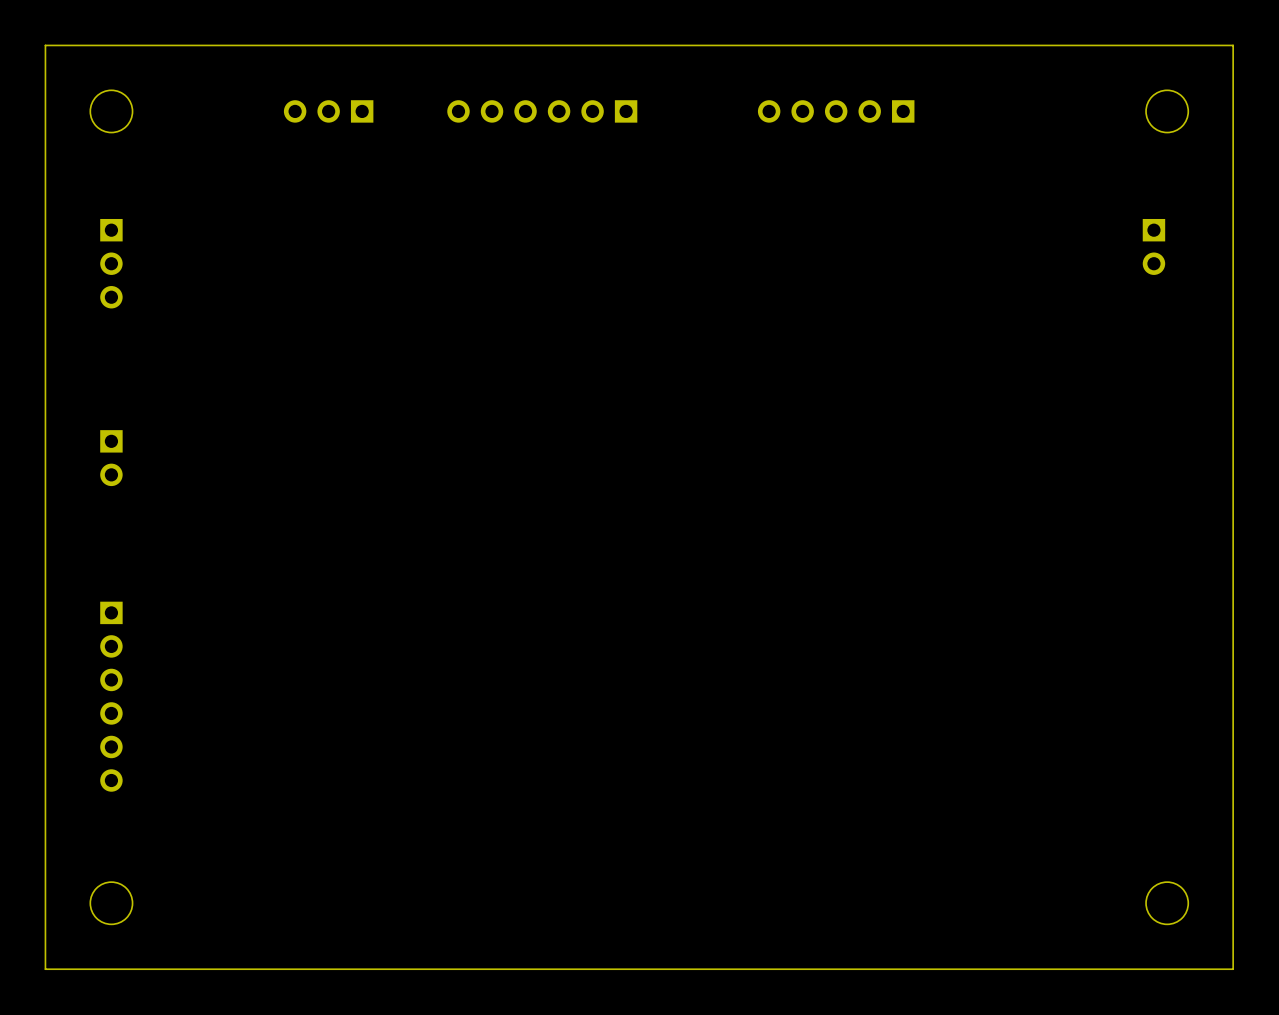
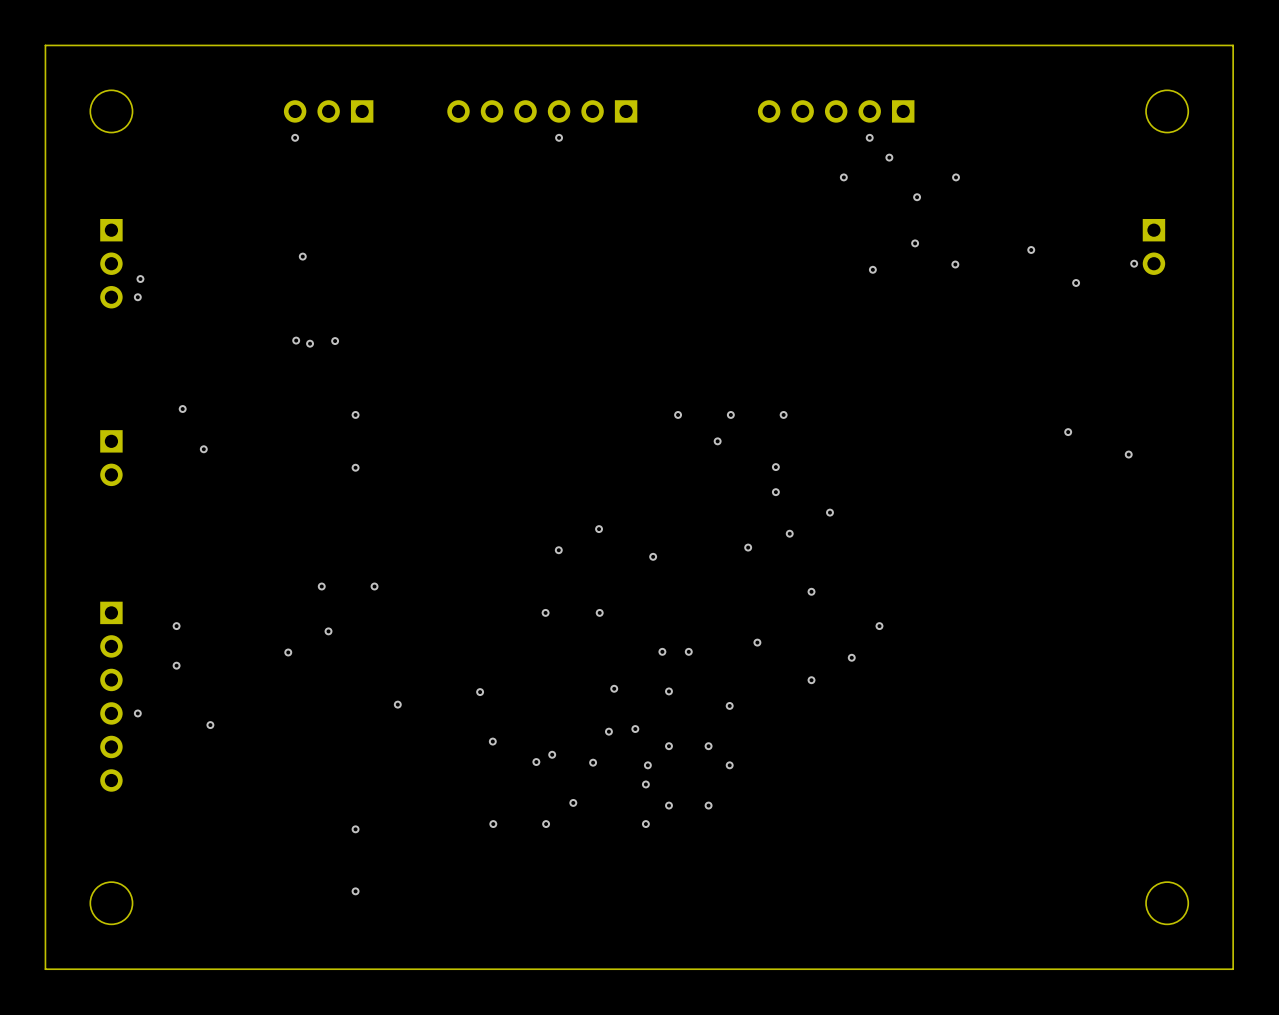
via: none -> (295, 137)
via: none -> (559, 137)
via: none -> (869, 137)
via: none -> (889, 157)
via: none -> (843, 177)
via: none -> (956, 177)
via: none -> (917, 197)
via: none -> (915, 243)
via: none -> (1031, 249)
via: none -> (302, 256)
via: none -> (1134, 263)
via: none -> (955, 264)
via: none -> (872, 269)
via: none -> (140, 279)
via: none -> (1076, 282)
via: none -> (137, 297)
via: none -> (296, 340)
via: none -> (335, 341)
via: none -> (310, 343)
via: none -> (182, 409)
via: none -> (355, 414)
via: none -> (678, 414)
via: none -> (730, 414)
via: none -> (783, 414)
via: none -> (1068, 432)
via: none -> (717, 441)
via: none -> (203, 449)
via: none -> (1128, 454)
via: none -> (355, 467)
via: none -> (775, 467)
via: none -> (775, 492)
via: none -> (829, 512)
via: none -> (599, 529)
via: none -> (789, 533)
via: none -> (748, 547)
via: none -> (558, 550)
via: none -> (653, 556)
via: none -> (321, 586)
via: none -> (374, 586)
via: none -> (811, 591)
via: none -> (545, 612)
via: none -> (599, 612)
via: none -> (176, 626)
via: none -> (879, 626)
via: none -> (328, 631)
via: none -> (757, 642)
via: none -> (662, 651)
via: none -> (688, 651)
via: none -> (288, 652)
via: none -> (851, 657)
via: none -> (176, 665)
via: none -> (811, 680)
via: none -> (614, 688)
via: none -> (668, 691)
via: none -> (480, 692)
via: none -> (397, 704)
via: none -> (729, 705)
via: none -> (137, 713)
via: none -> (210, 725)
via: none -> (635, 729)
via: none -> (608, 731)
via: none -> (492, 741)
via: none -> (668, 746)
via: none -> (708, 746)
via: none -> (552, 754)
via: none -> (536, 762)
via: none -> (593, 762)
via: none -> (647, 765)
via: none -> (729, 765)
via: none -> (645, 784)
via: none -> (573, 802)
via: none -> (668, 805)
via: none -> (708, 805)
via: none -> (493, 824)
via: none -> (546, 824)
via: none -> (645, 824)
via: none -> (355, 829)
via: none -> (355, 891)

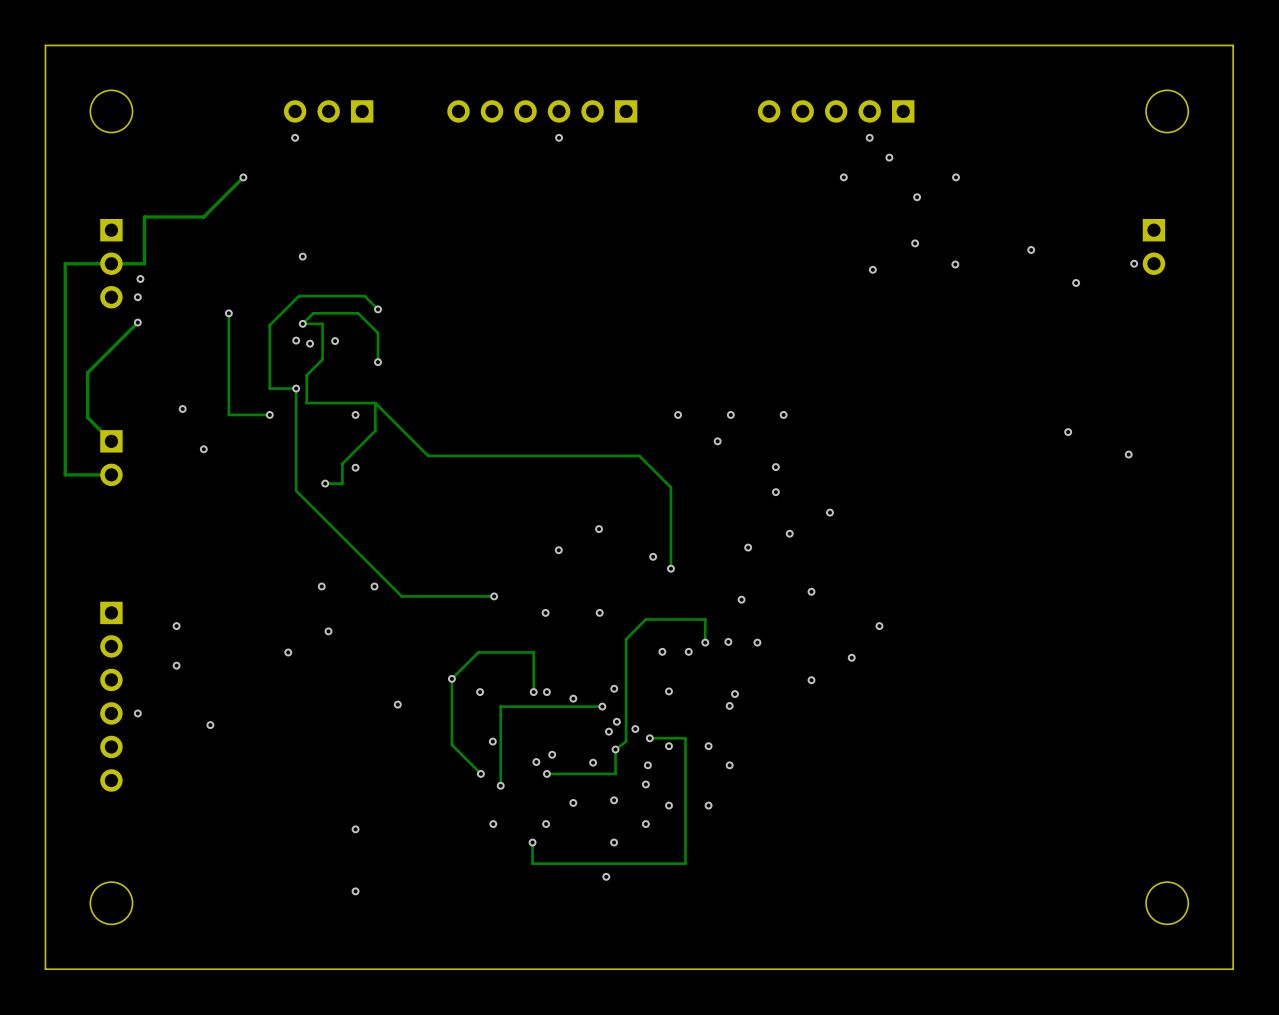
track: none -> (243, 177) (203, 217) (144, 217) (144, 263) (65, 263) (65, 474) (111, 474)
via: none -> (243, 177)
track: none -> (378, 309) (364, 296) (298, 296) (269, 325) (269, 388) (296, 388) (296, 490) (401, 596) (494, 596)
via: none -> (378, 309)
track: none -> (228, 313) (228, 414) (269, 414)
via: none -> (228, 313)
track: none -> (137, 322) (87, 372) (87, 417) (111, 441)
via: none -> (137, 322)
via: none -> (302, 323)
track: none -> (378, 362) (378, 333) (358, 313) (313, 313) (302, 323) (322, 323) (322, 359) (306, 375) (306, 403) (375, 403)
via: none -> (378, 362)
via: none -> (296, 388)
track: none -> (375, 403) (428, 455) (639, 455) (670, 487) (670, 568)
track: none -> (375, 403) (375, 430) (342, 463) (342, 483) (325, 483)
via: none -> (269, 414)
via: none -> (325, 483)
via: none -> (670, 568)
via: none -> (494, 596)
via: none -> (741, 599)
via: none -> (728, 641)
track: none -> (705, 642) (705, 619) (645, 619) (626, 639) (626, 741) (615, 749) (615, 773) (546, 773)
via: none -> (705, 642)
via: none -> (451, 678)
track: none -> (533, 692) (533, 652) (478, 652) (451, 678) (451, 744) (480, 773)
via: none -> (533, 692)
via: none -> (546, 692)
via: none -> (734, 694)
via: none -> (573, 698)
track: none -> (602, 706) (500, 706) (500, 785)
via: none -> (602, 706)
via: none -> (616, 721)
track: none -> (649, 738) (685, 738) (685, 863) (532, 863) (532, 842)
via: none -> (649, 738)
via: none -> (615, 749)
via: none -> (480, 773)
via: none -> (546, 773)
via: none -> (500, 785)
via: none -> (614, 800)
via: none -> (532, 842)
via: none -> (614, 842)
via: none -> (606, 876)

